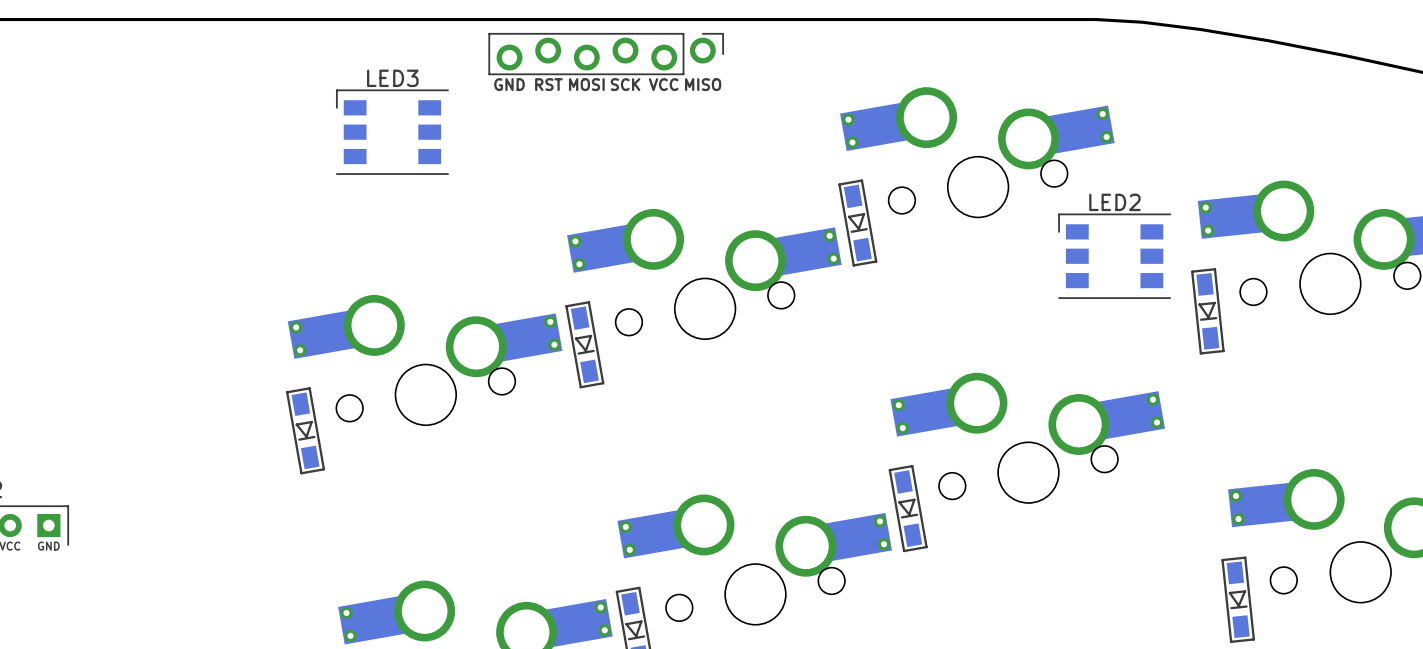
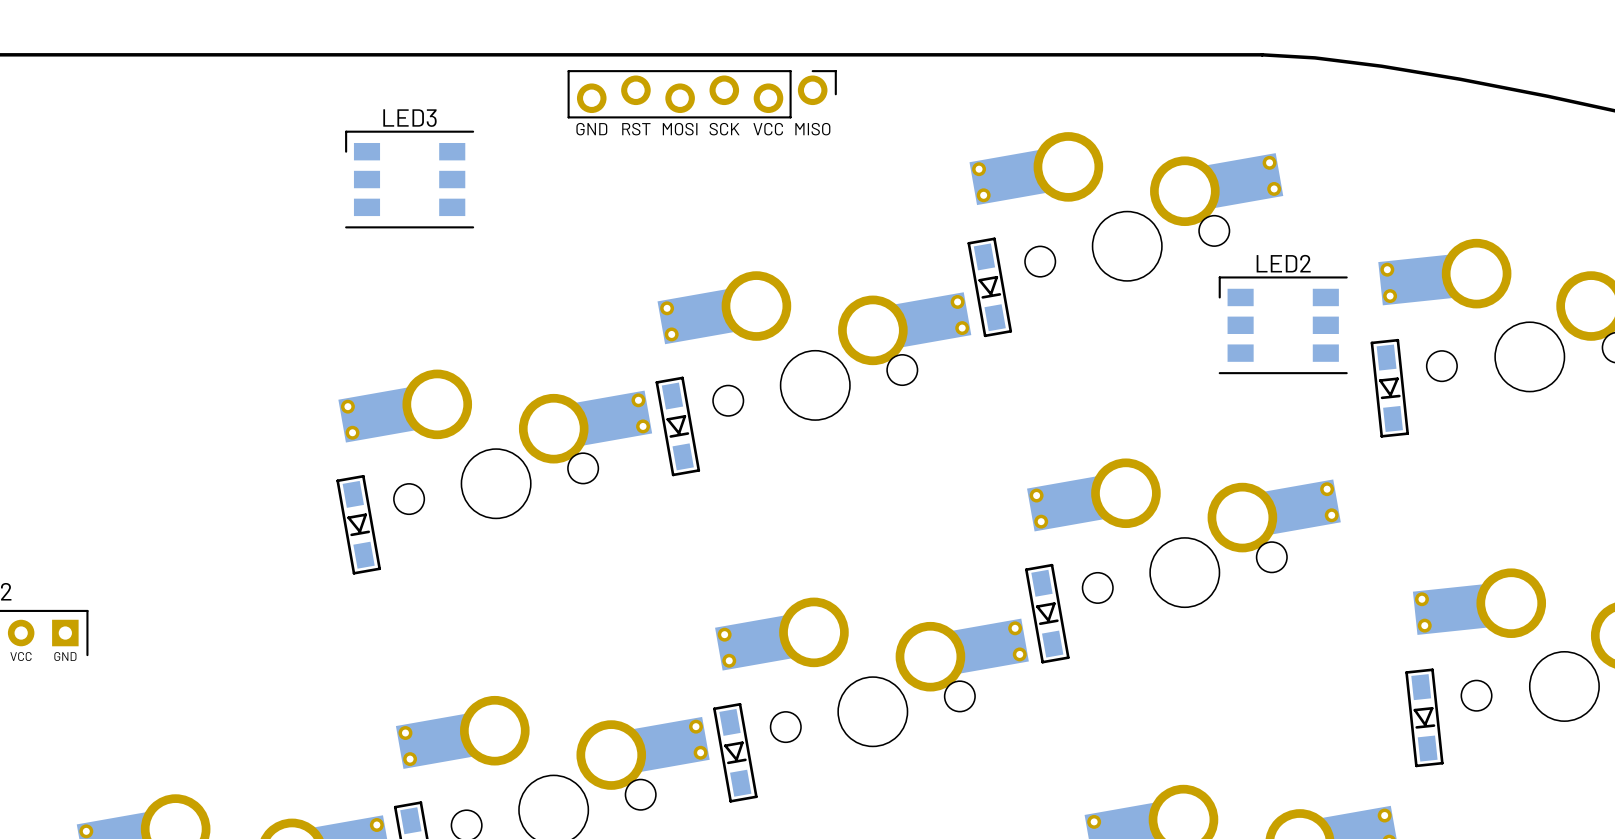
LED3 position: (392, 132) -> (409, 179)

